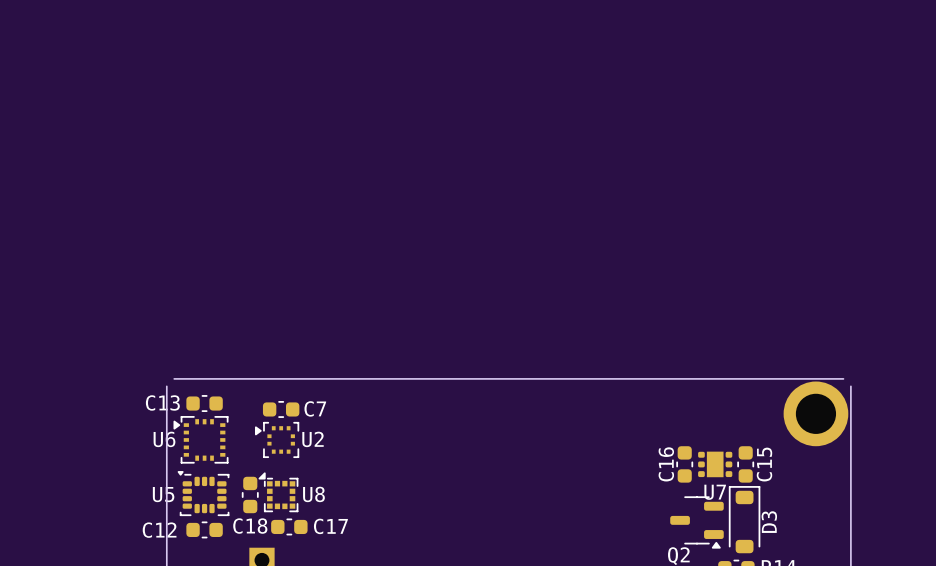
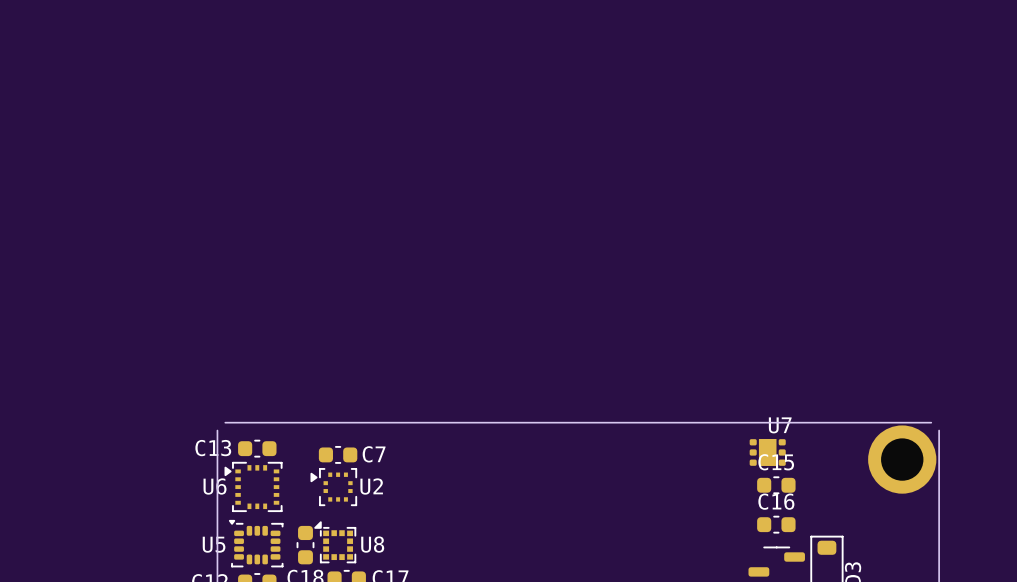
C16 rotation: 0° (684, 464) -> 90° clockwise (776, 524)
U7 position: (715, 464) -> (767, 452)
C15 rotation: 0° (745, 464) -> 90° clockwise (776, 485)
C15 position: (745, 464) -> (776, 485)
U7 name position: U7 (715, 492) -> U7 (780, 425)

